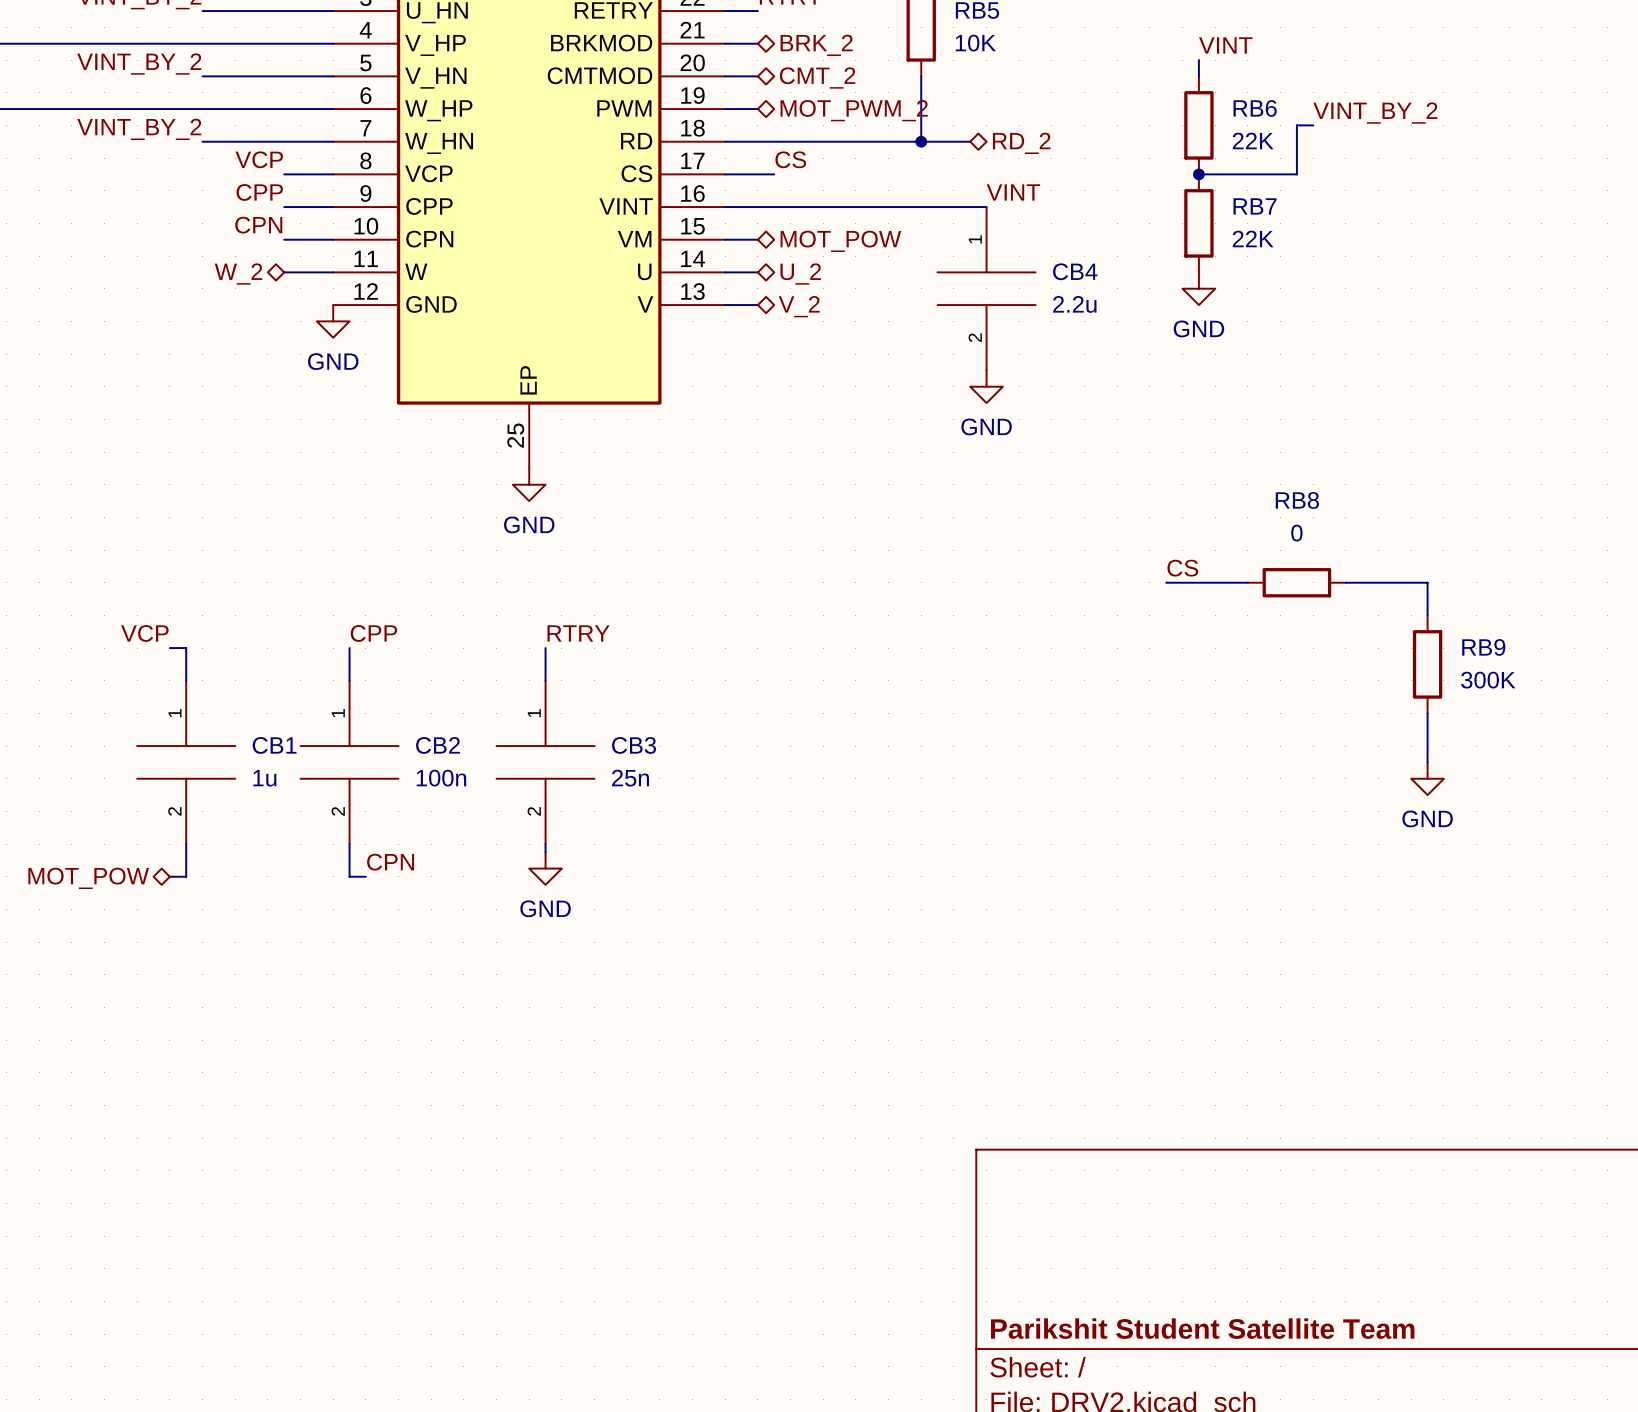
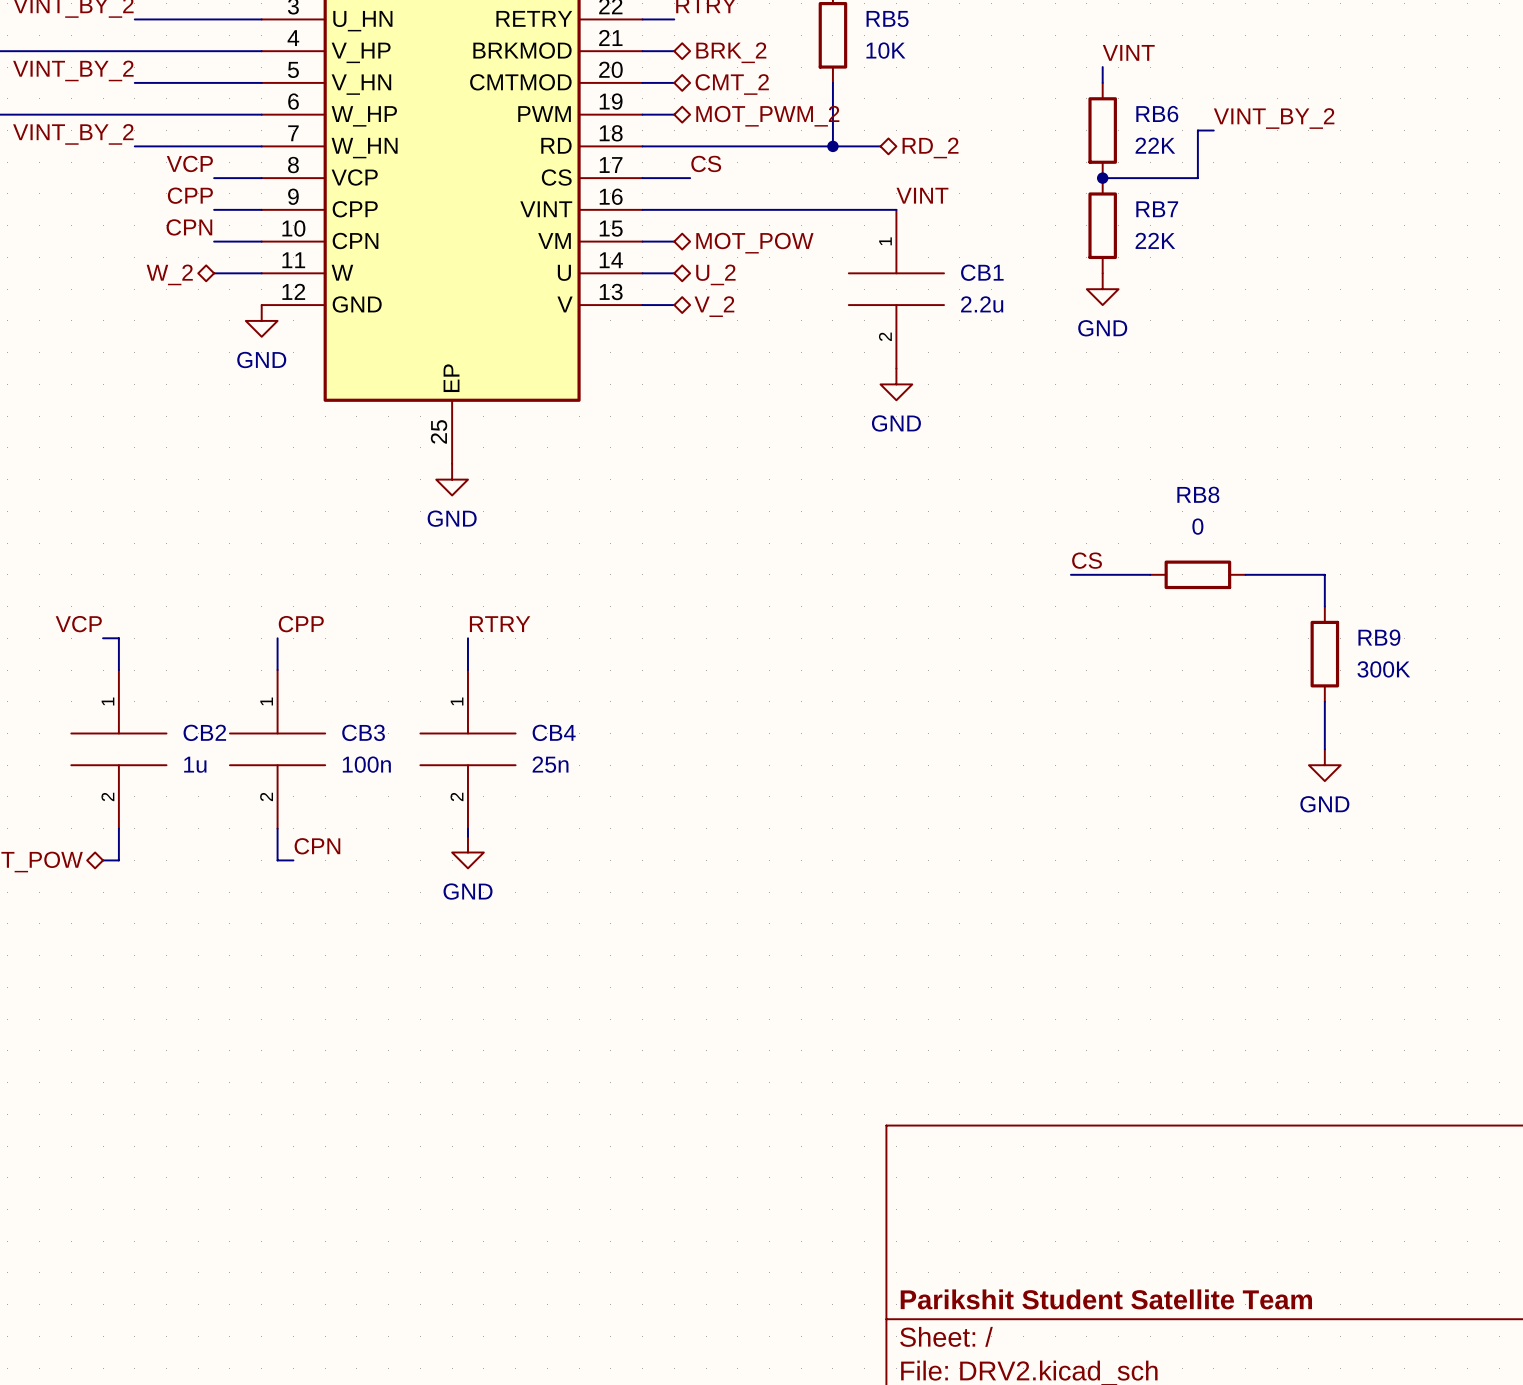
CB4 name: CB4 (1075, 271) -> CB1 (982, 272)
CB1 name: CB1 (274, 745) -> CB2 (204, 732)
CB2 name: CB2 (437, 745) -> CB3 (363, 732)
CB3 name: CB3 (634, 745) -> CB4 (554, 732)

